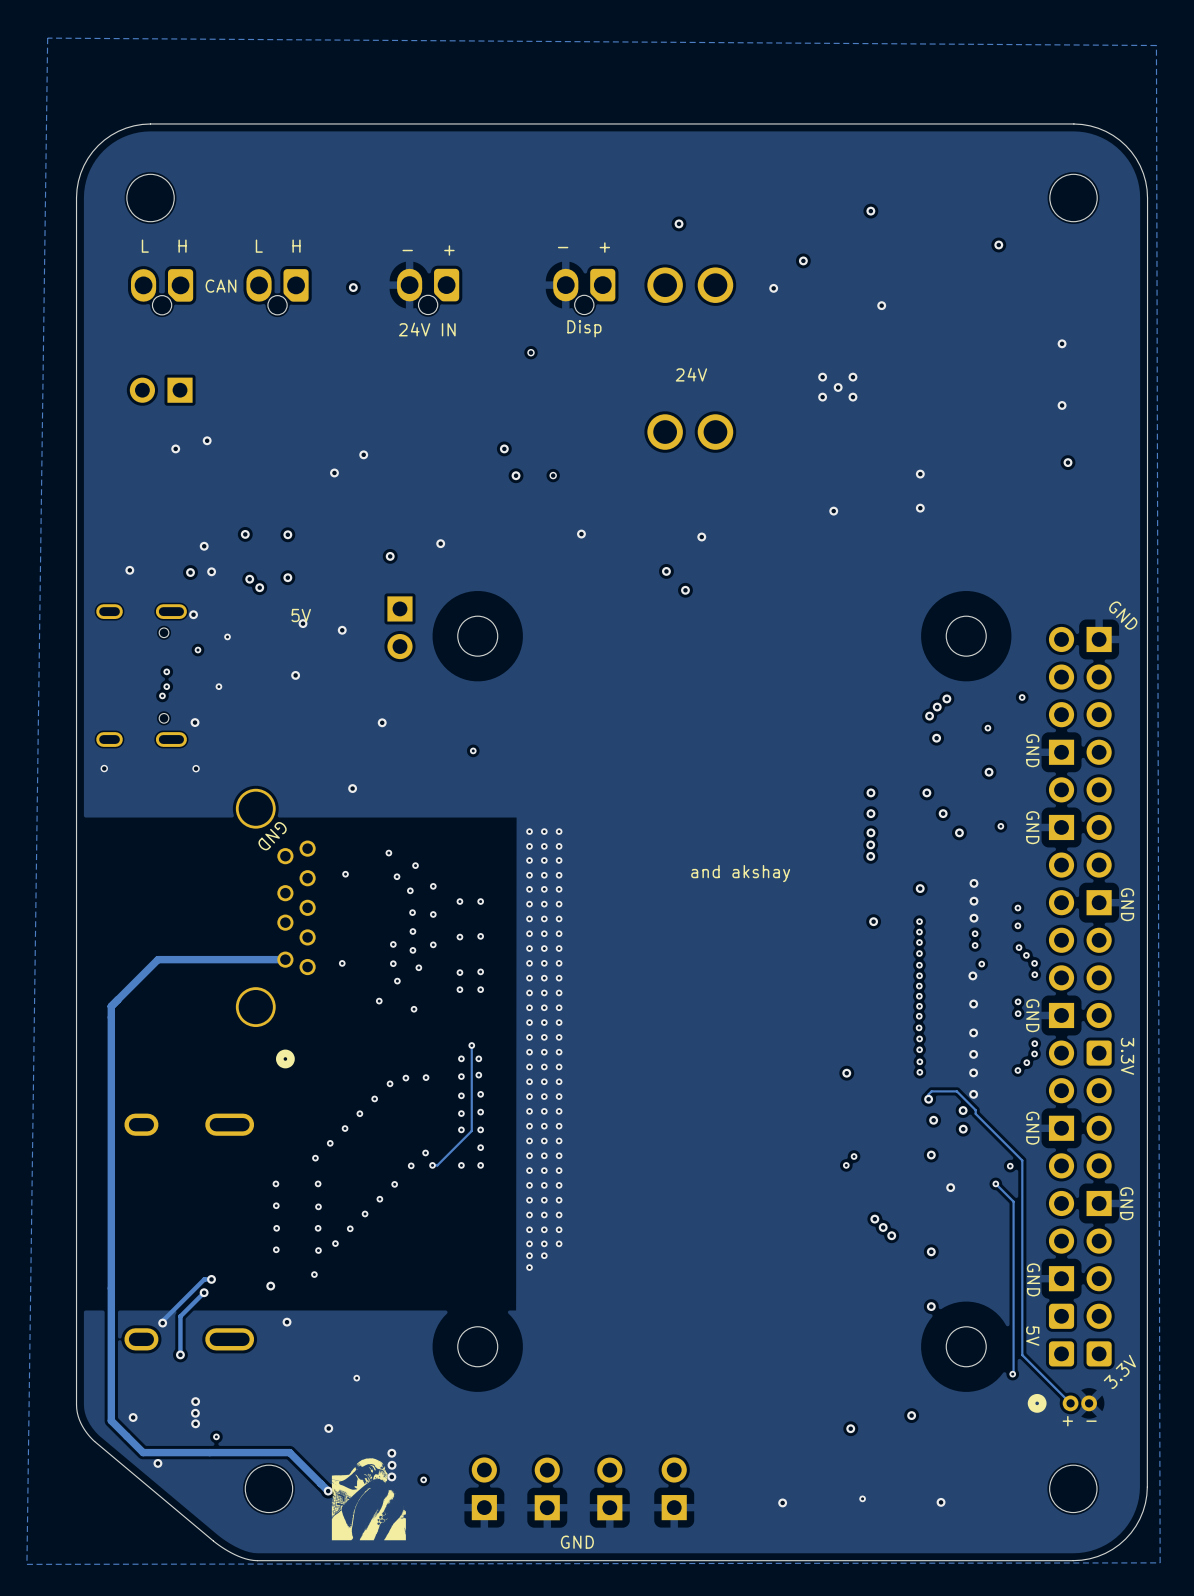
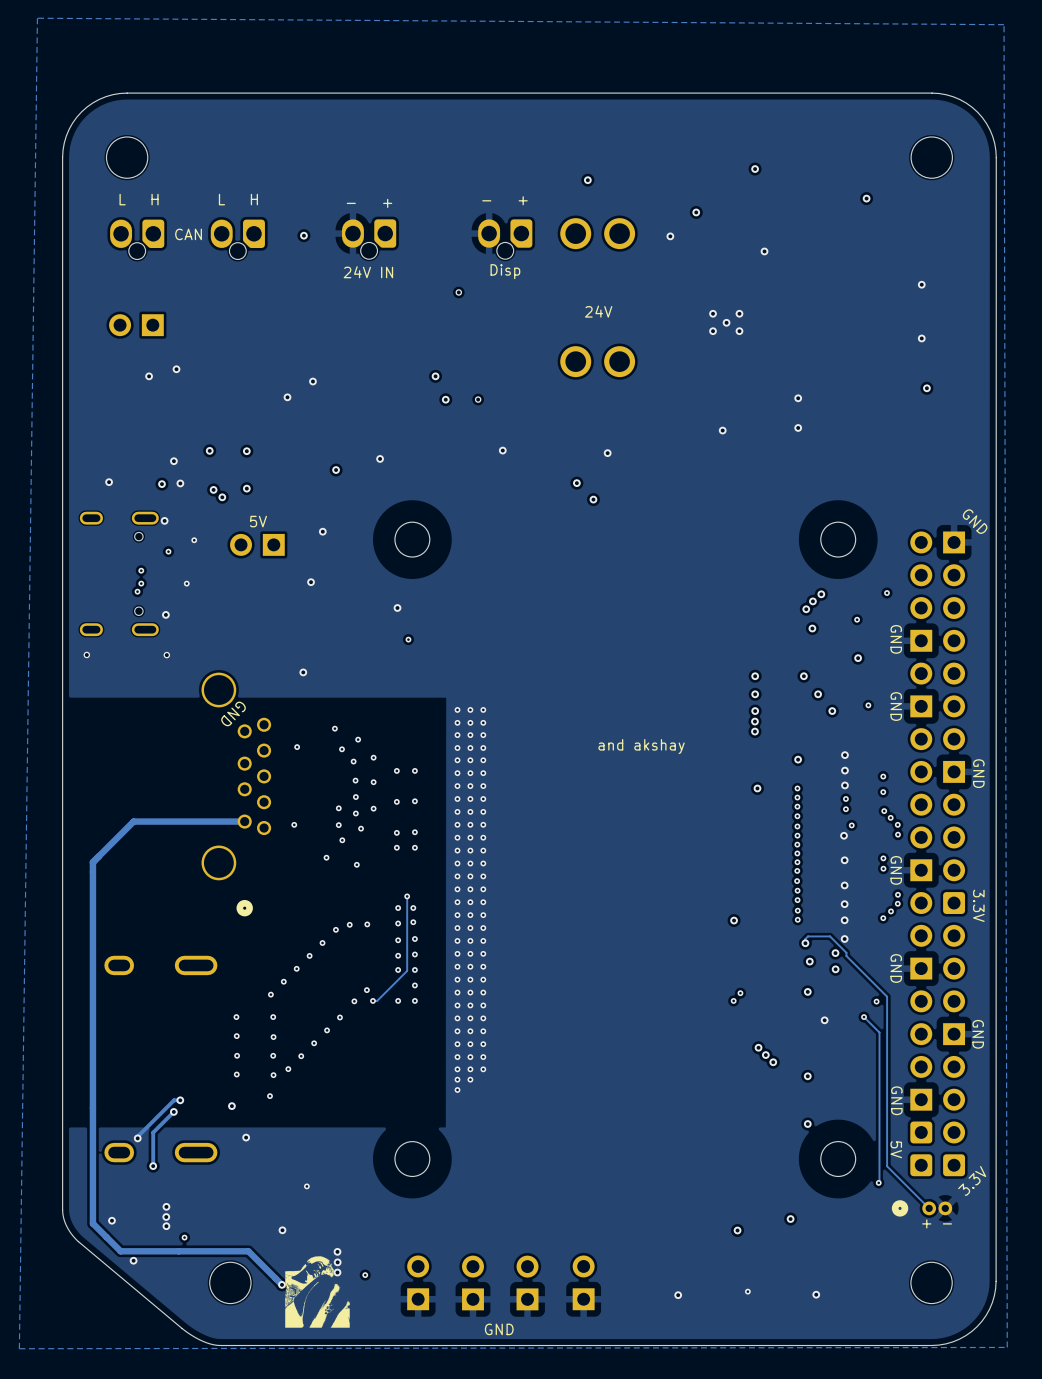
via: (303, 623) -> none
via: none -> (322, 531)
part rotation: 0° (399, 627) -> 90° clockwise (257, 544)
part position: (399, 627) -> (257, 544)
via: (342, 630) -> none
via: (295, 675) -> none
via: none -> (311, 582)
via: none -> (397, 607)
via: (382, 722) -> none

